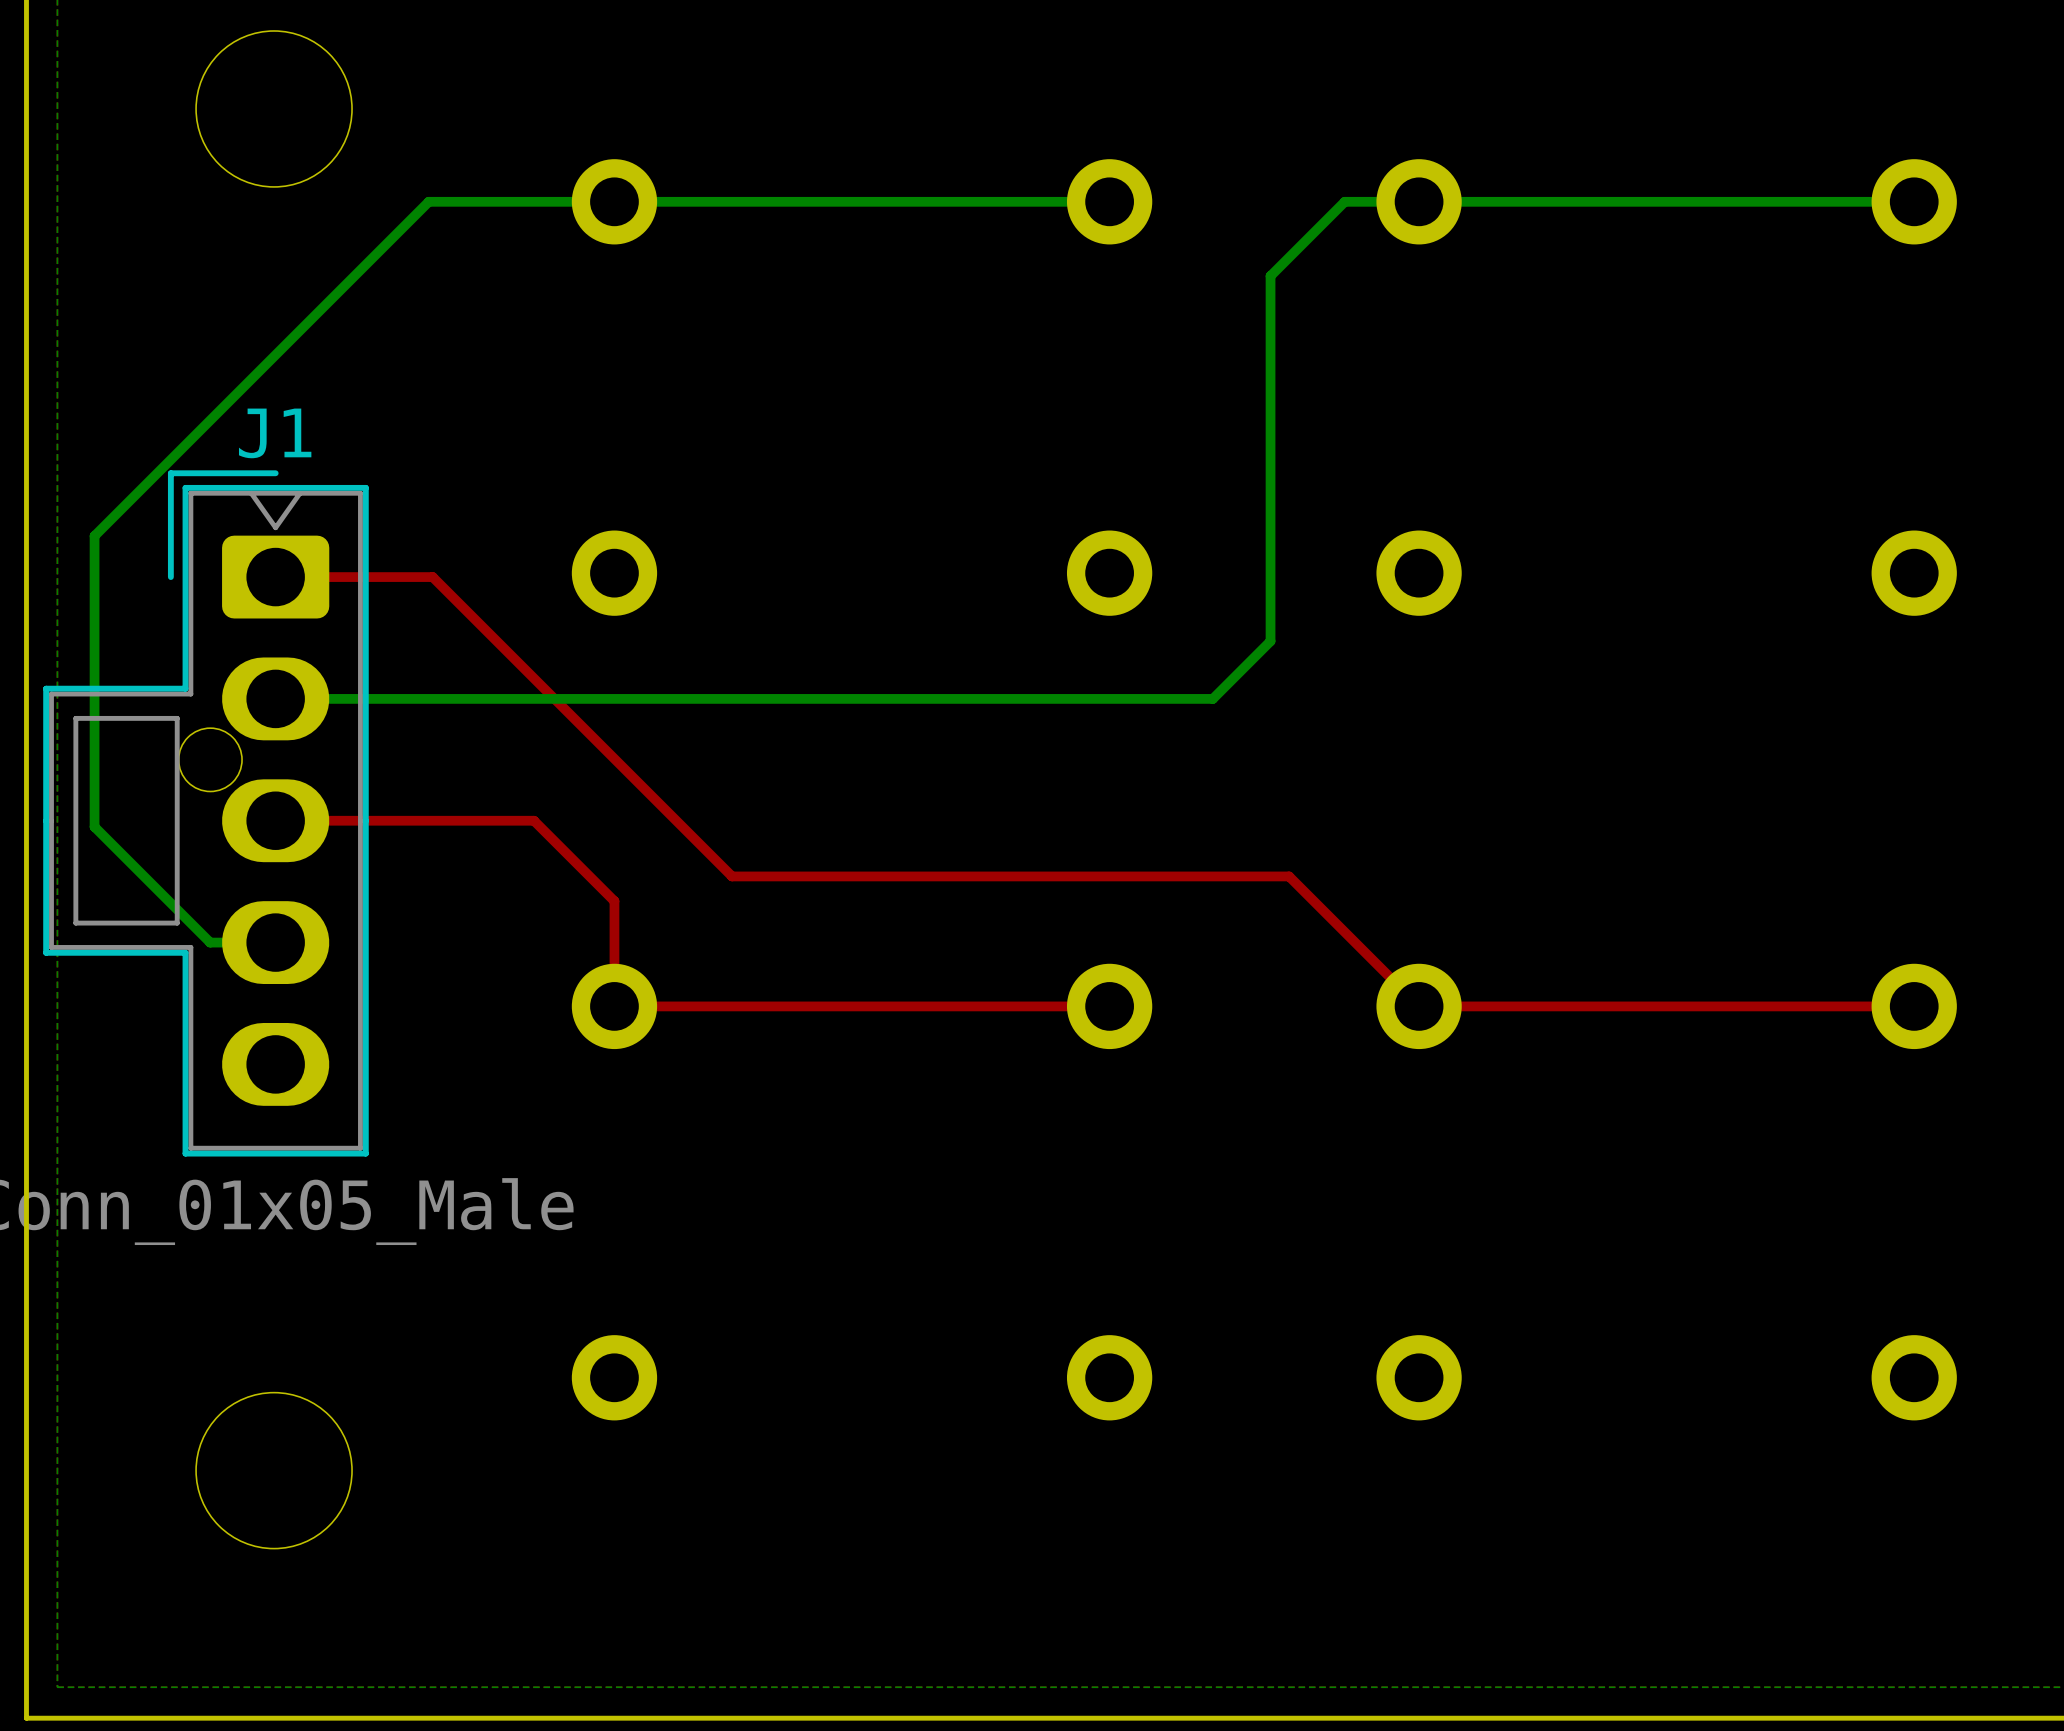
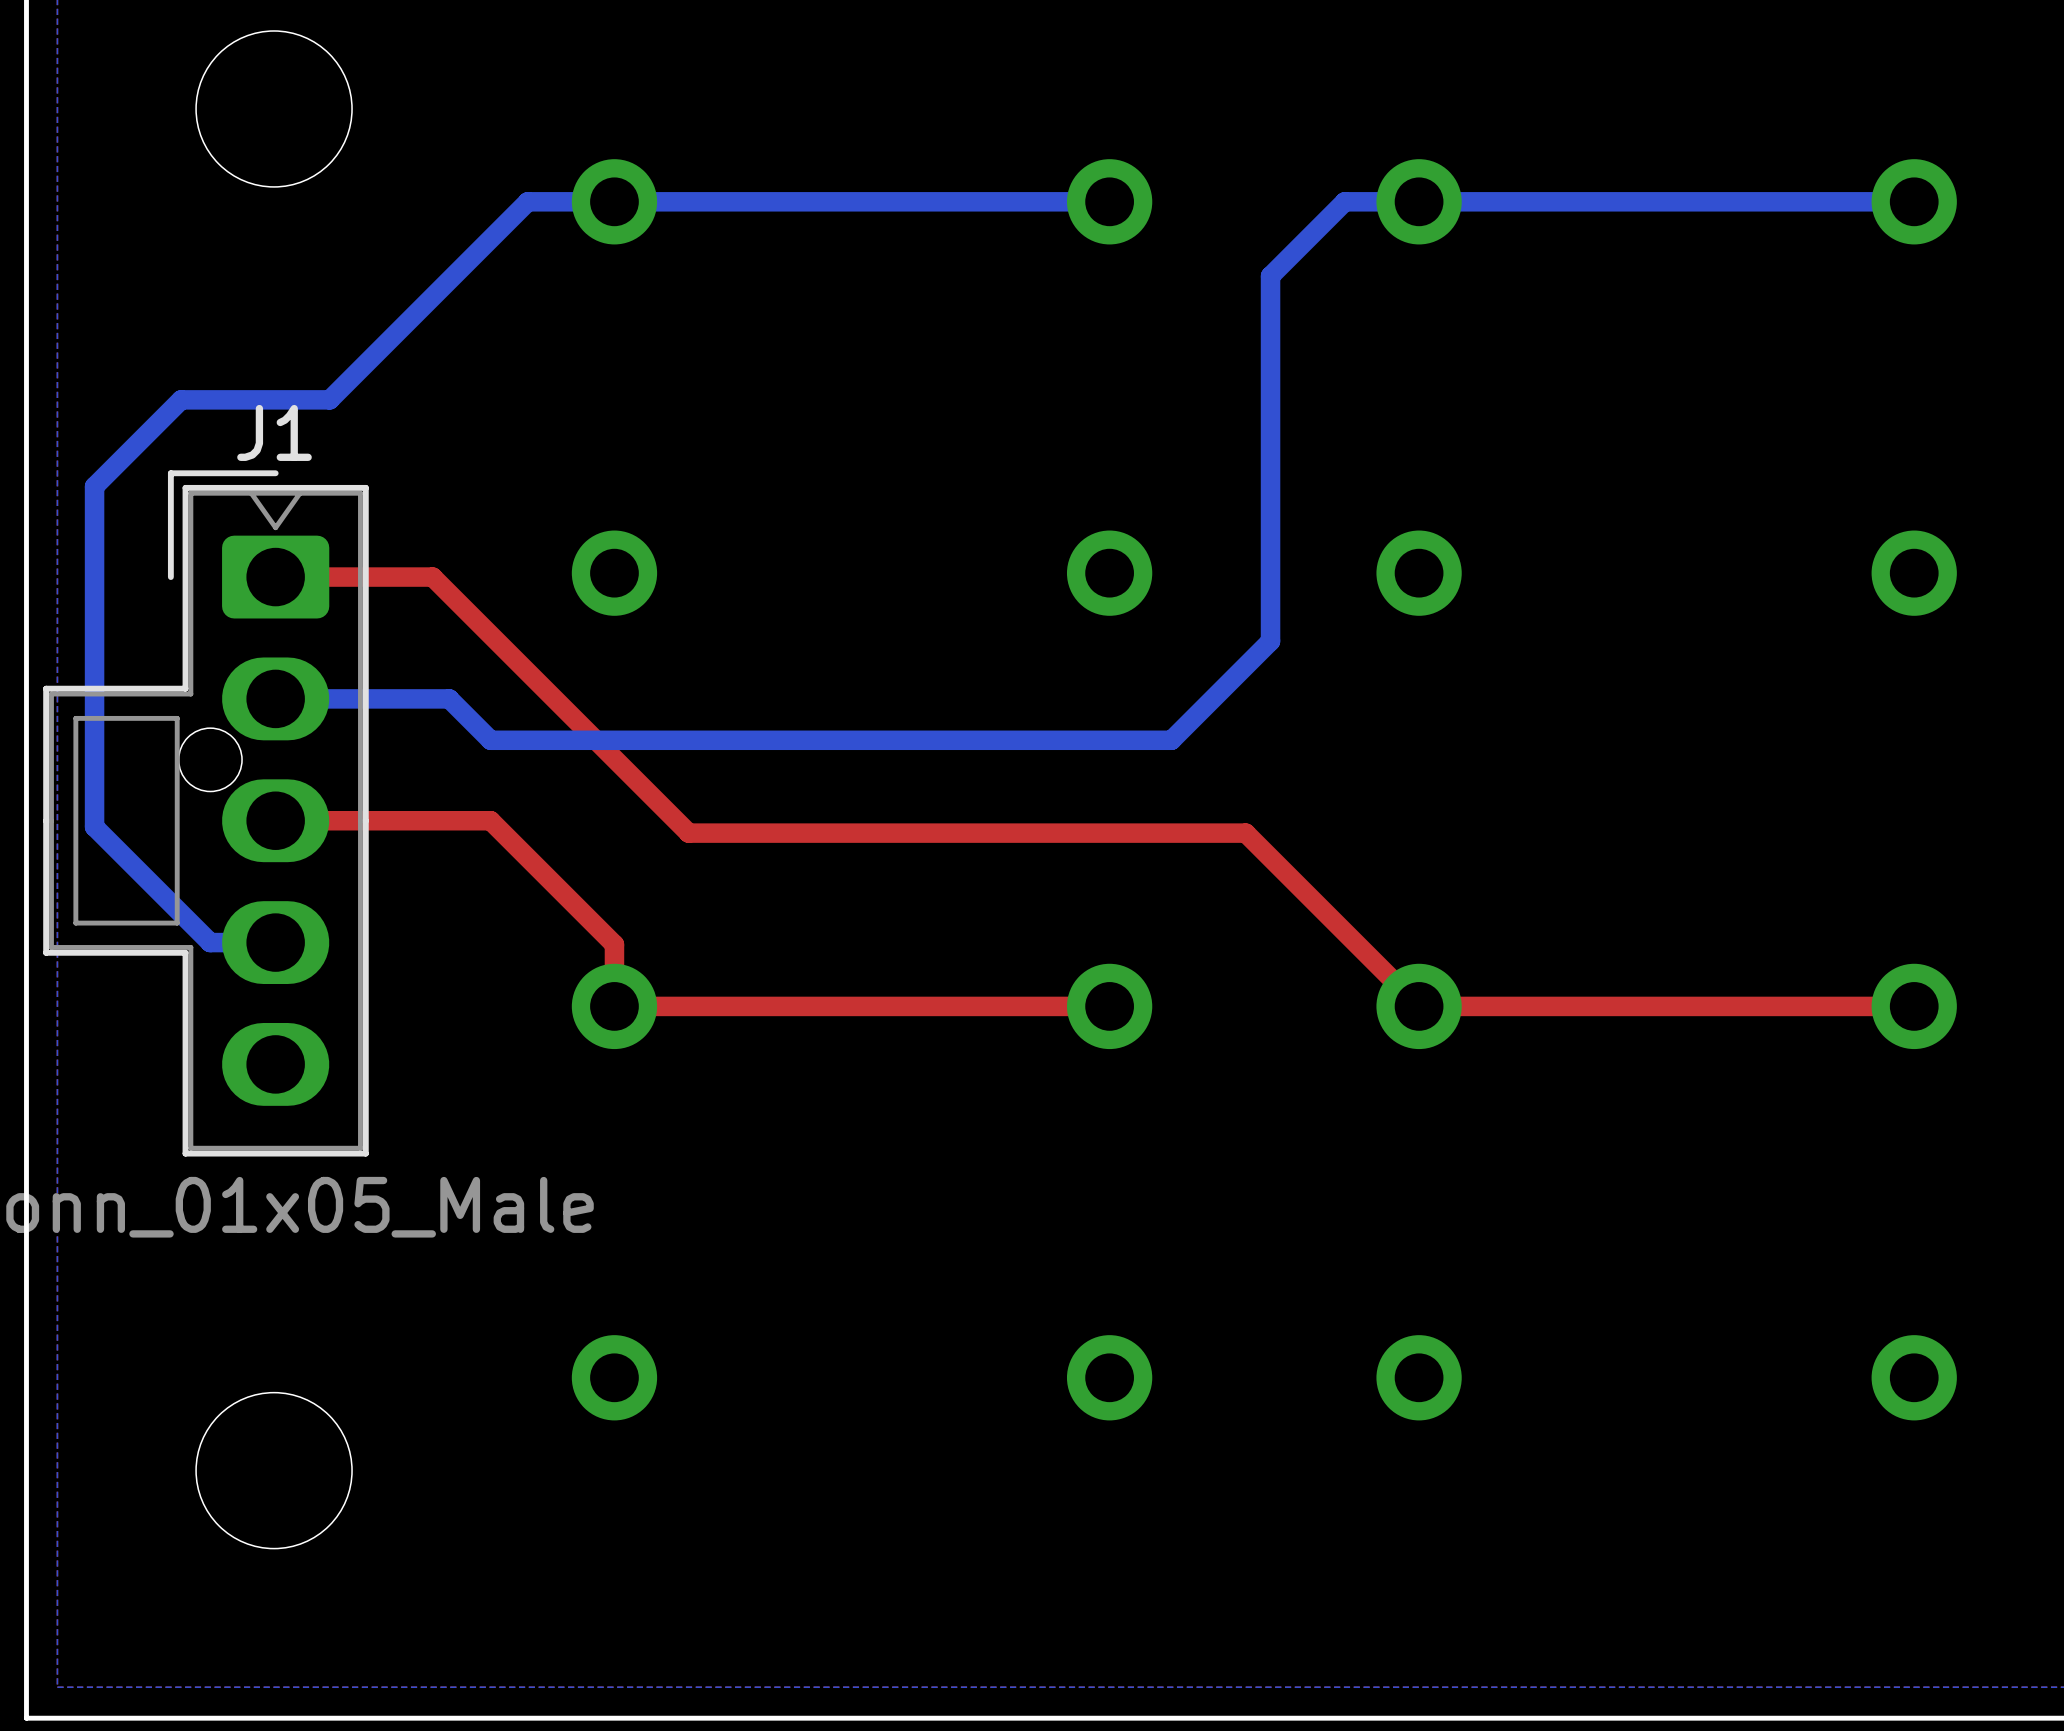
bottom track: (527, 201) (428, 201) (94, 536) -> (527, 201) (329, 399) (181, 399) (94, 486) (94, 536)
bottom track width: thin (1109, 201) (527, 201) -> thick (1109, 201) (527, 201)
bottom track width: thin (1914, 201) (1344, 201) (1270, 276) (1270, 641) (1212, 698) -> thick (1914, 201) (1344, 201) (1270, 276) (1270, 641) (1212, 698)
bottom track width: thin (94, 536) (94, 826) (210, 942) (275, 942) -> thick (94, 536) (94, 826) (210, 942) (275, 942)
top track width: thin (275, 577) (432, 577) (688, 833) -> thick (275, 577) (432, 577) (688, 833)
bottom track width: thin (449, 698) (275, 698) -> thick (449, 698) (275, 698)
bottom track: (1212, 698) (449, 698) -> (1212, 698) (1171, 740) (490, 740) (449, 698)
top track: (490, 820) (534, 820) (614, 901) (614, 944) -> (490, 820) (614, 944)
top track width: thin (490, 820) (275, 820) -> thick (490, 820) (275, 820)
top track: (688, 833) (732, 876) (1289, 876) -> (688, 833) (1245, 833) (1289, 876)
top track width: thin (1289, 876) (1419, 1006) (1914, 1006) -> thick (1289, 876) (1419, 1006) (1914, 1006)
top track width: thin (614, 944) (614, 1006) (1109, 1006) -> thick (614, 944) (614, 1006) (1109, 1006)

